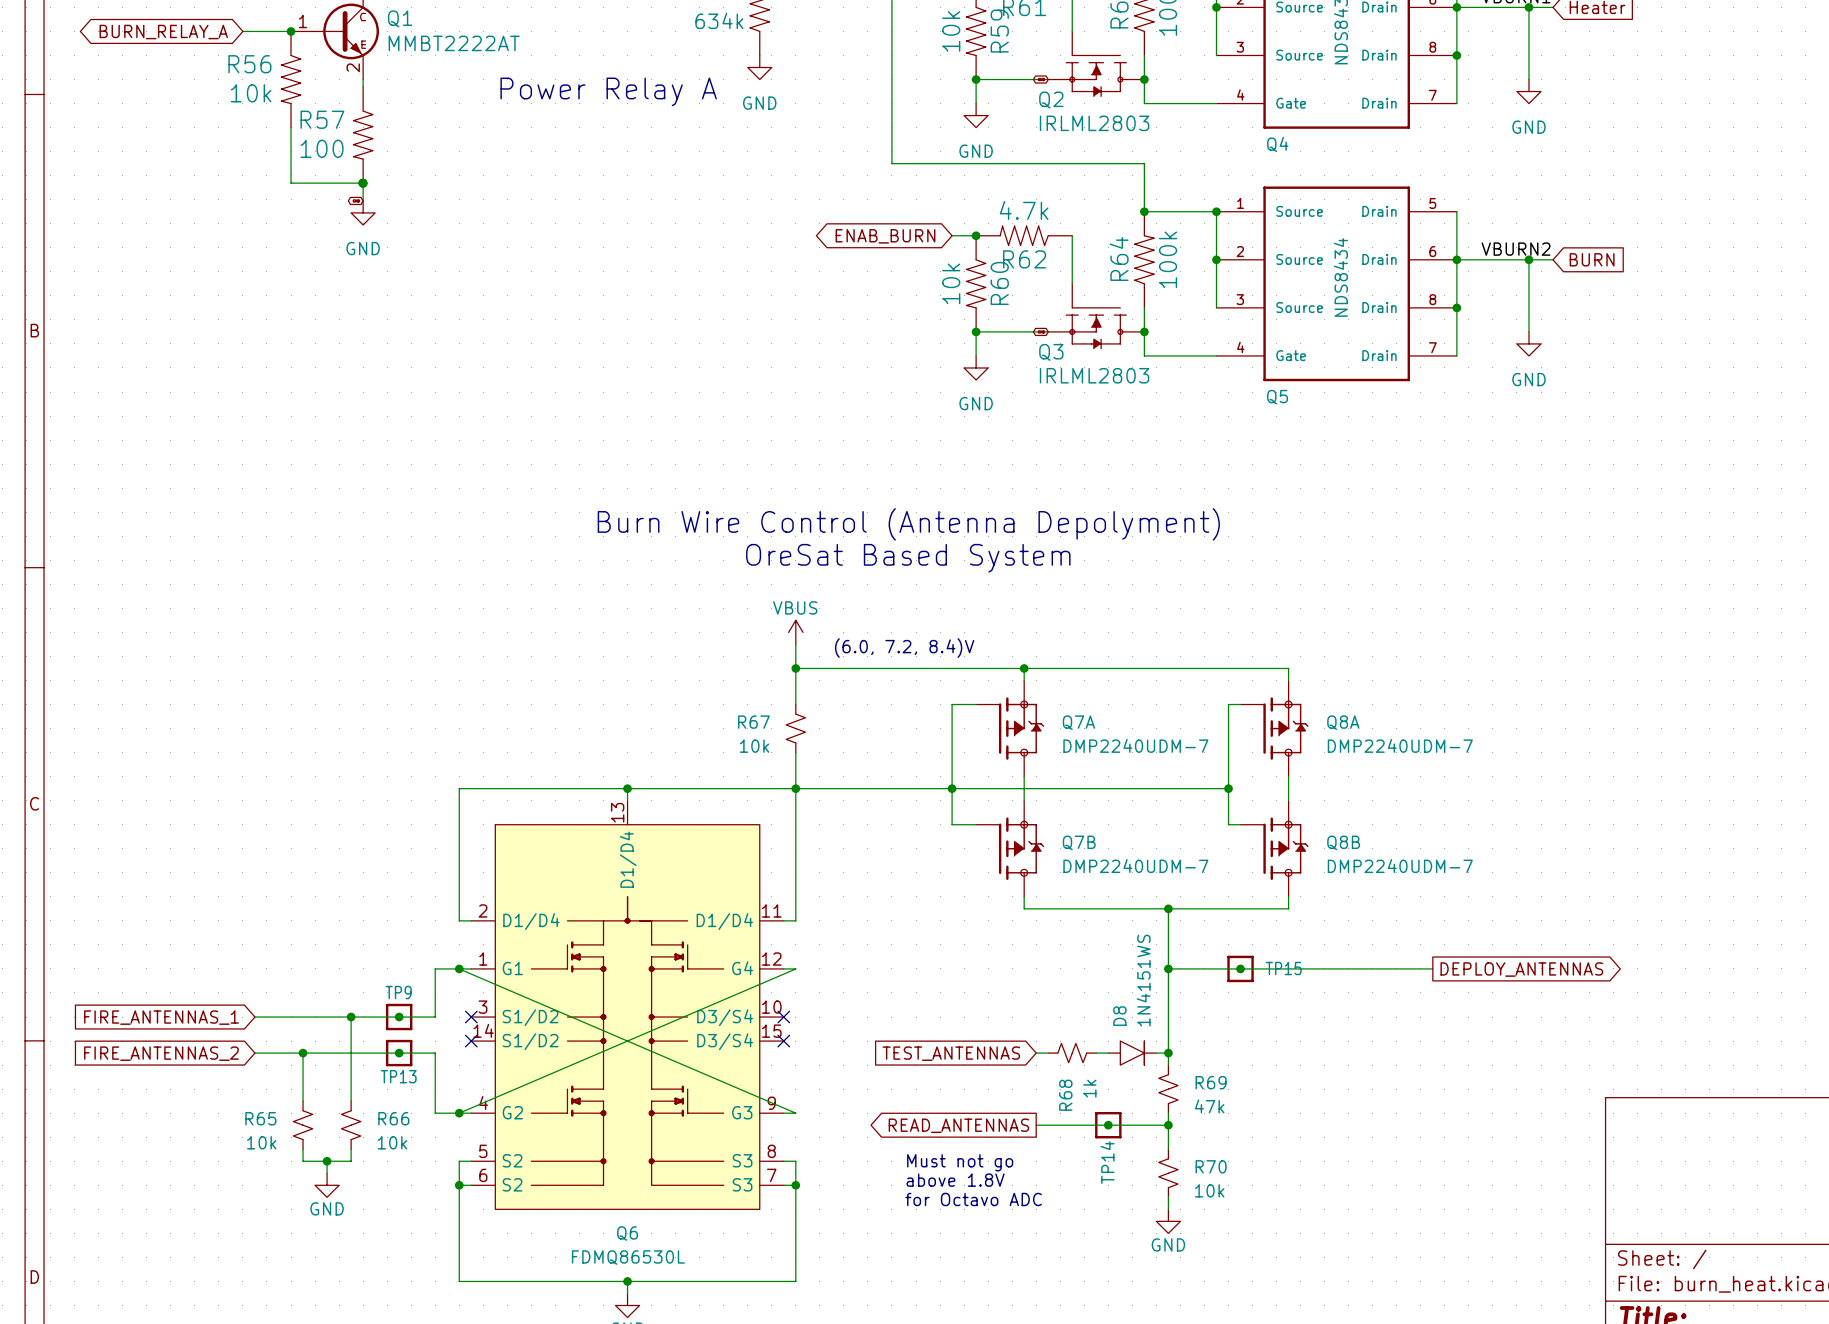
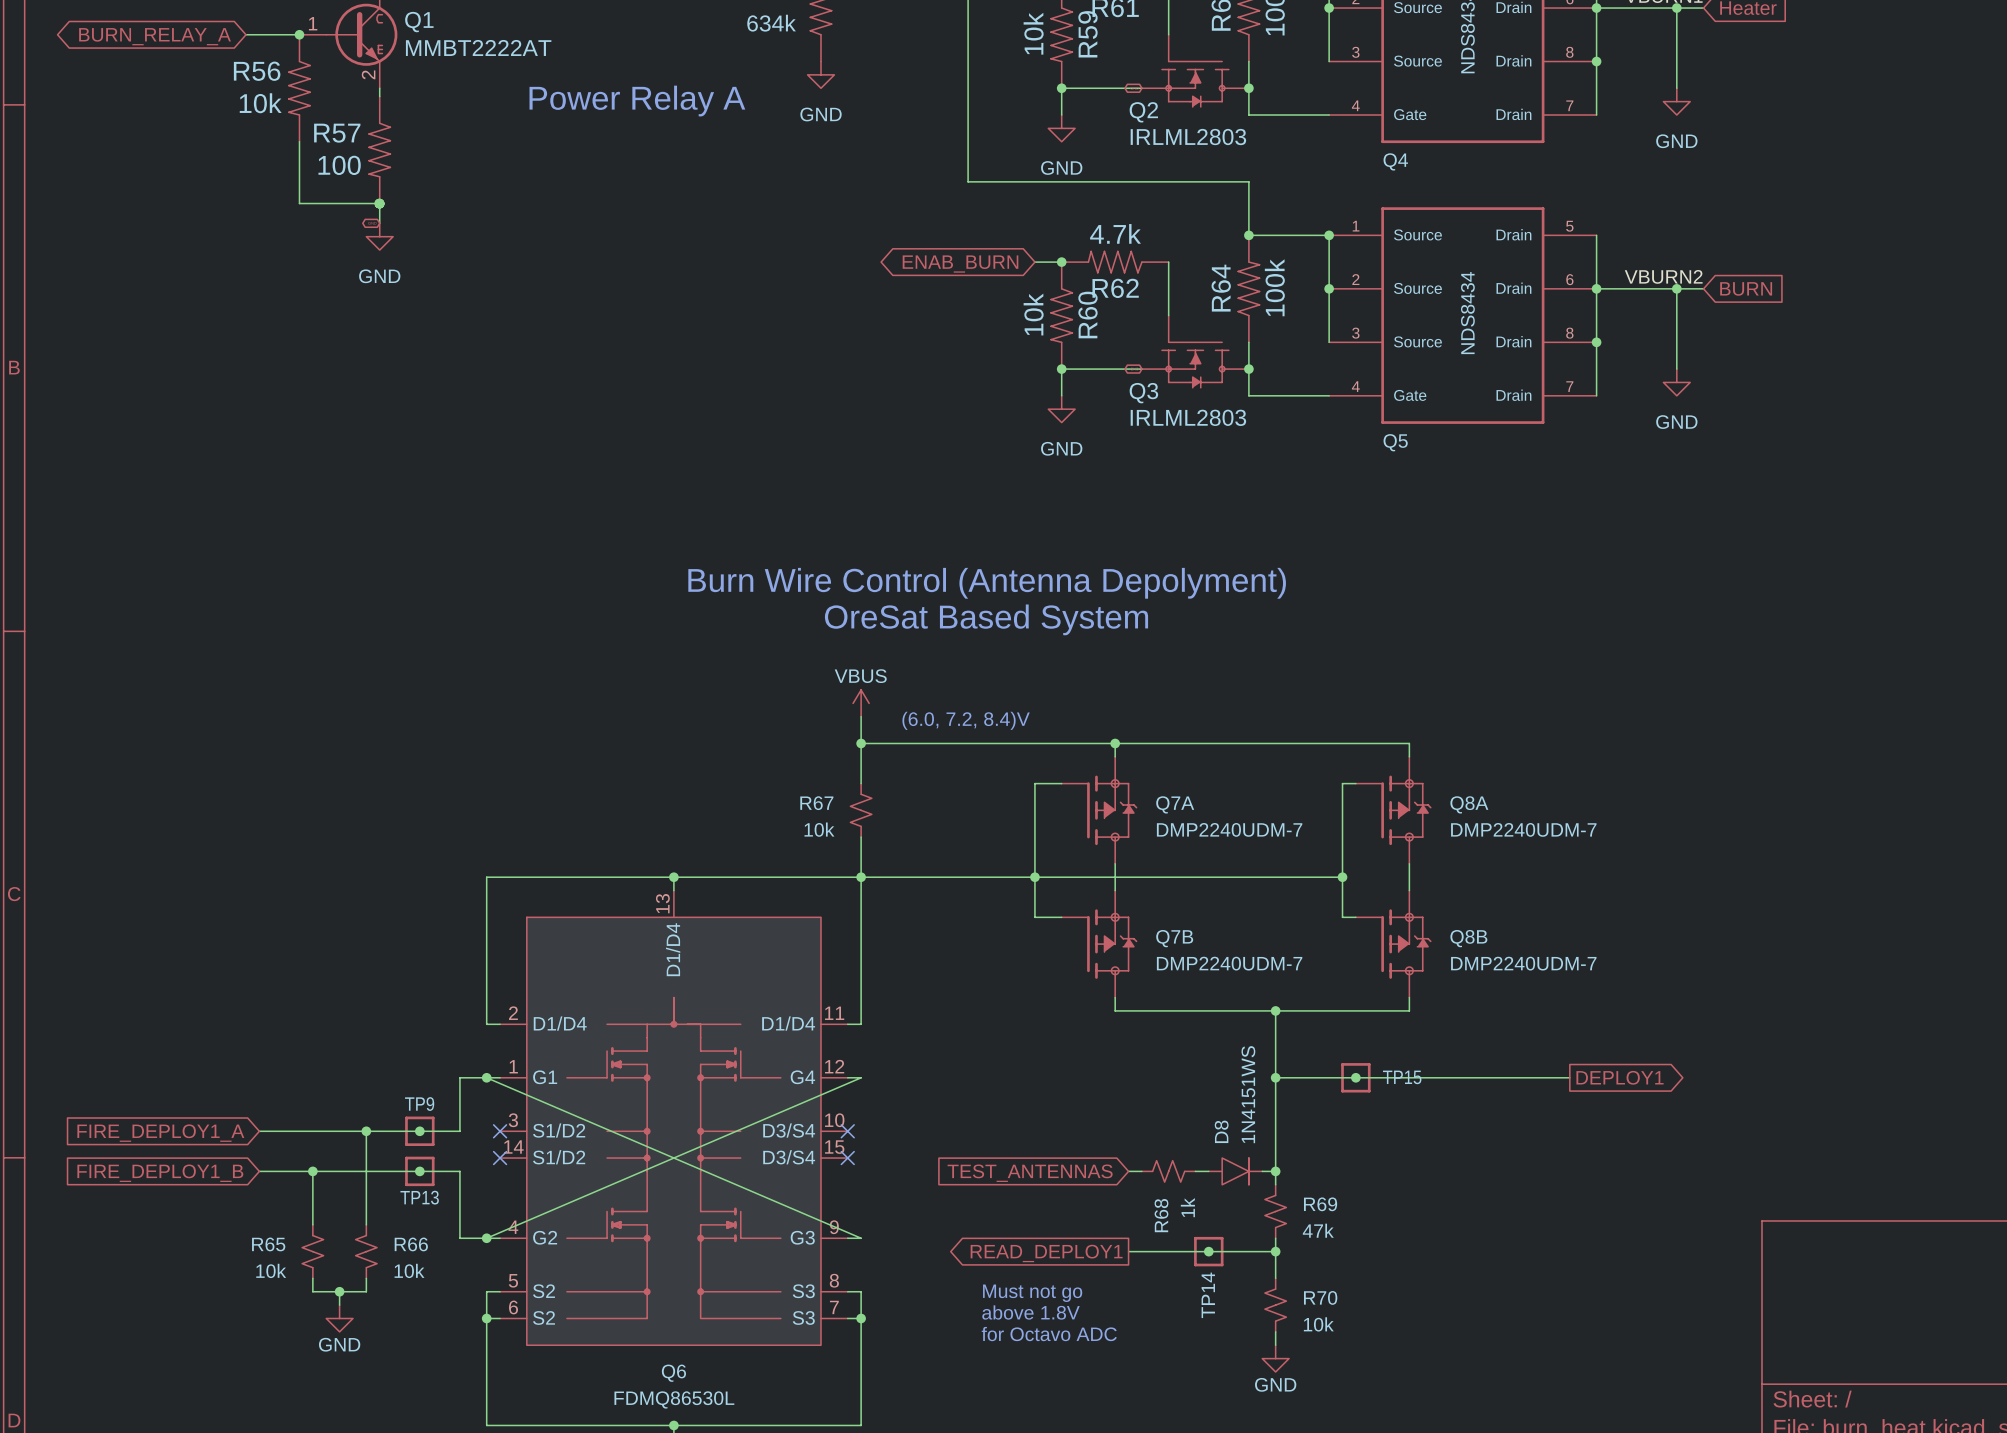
global label: DEPLOY_ANTENNAS (1521, 969) -> DEPLOY1 (1620, 1077)
global label: FIRE_ANTENNAS_1 (161, 1017) -> FIRE_DEPLOY1_A (160, 1133)
global label: FIRE_ANTENNAS_2 (161, 1053) -> FIRE_DEPLOY1_B (160, 1173)
global label: READ_ANTENNAS (958, 1125) -> READ_DEPLOY1 (1046, 1253)

